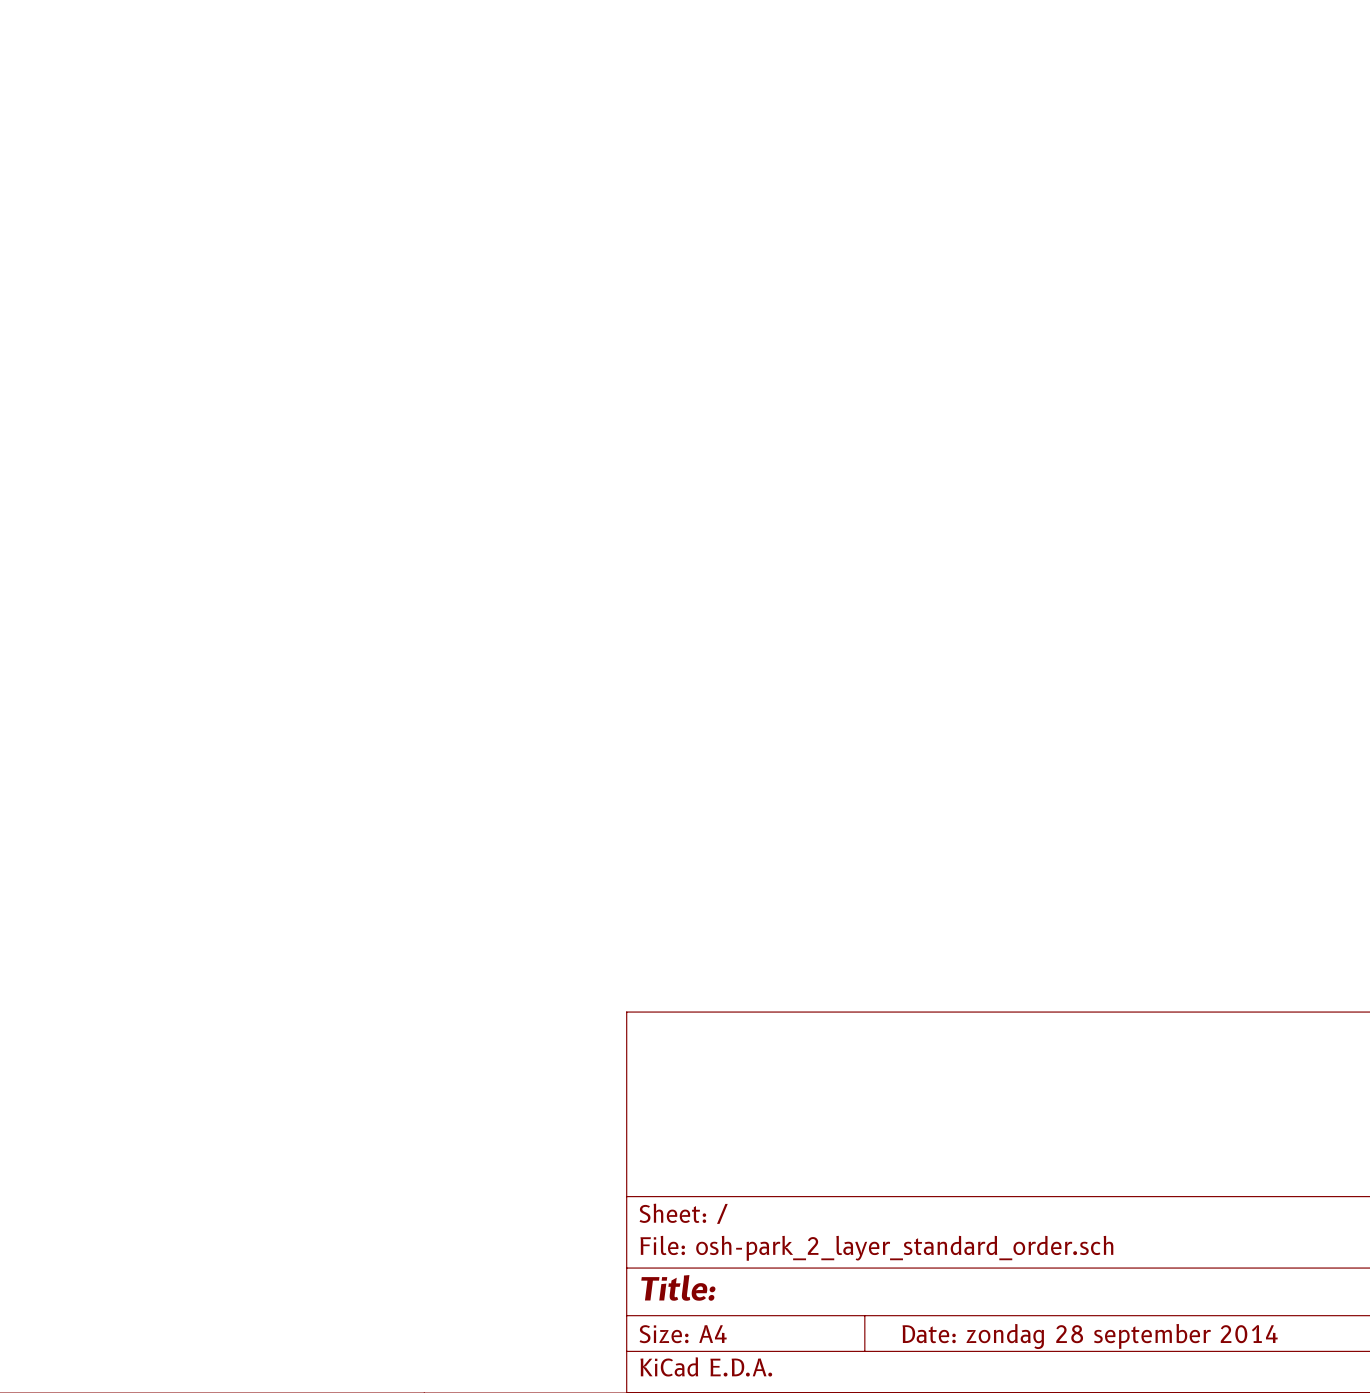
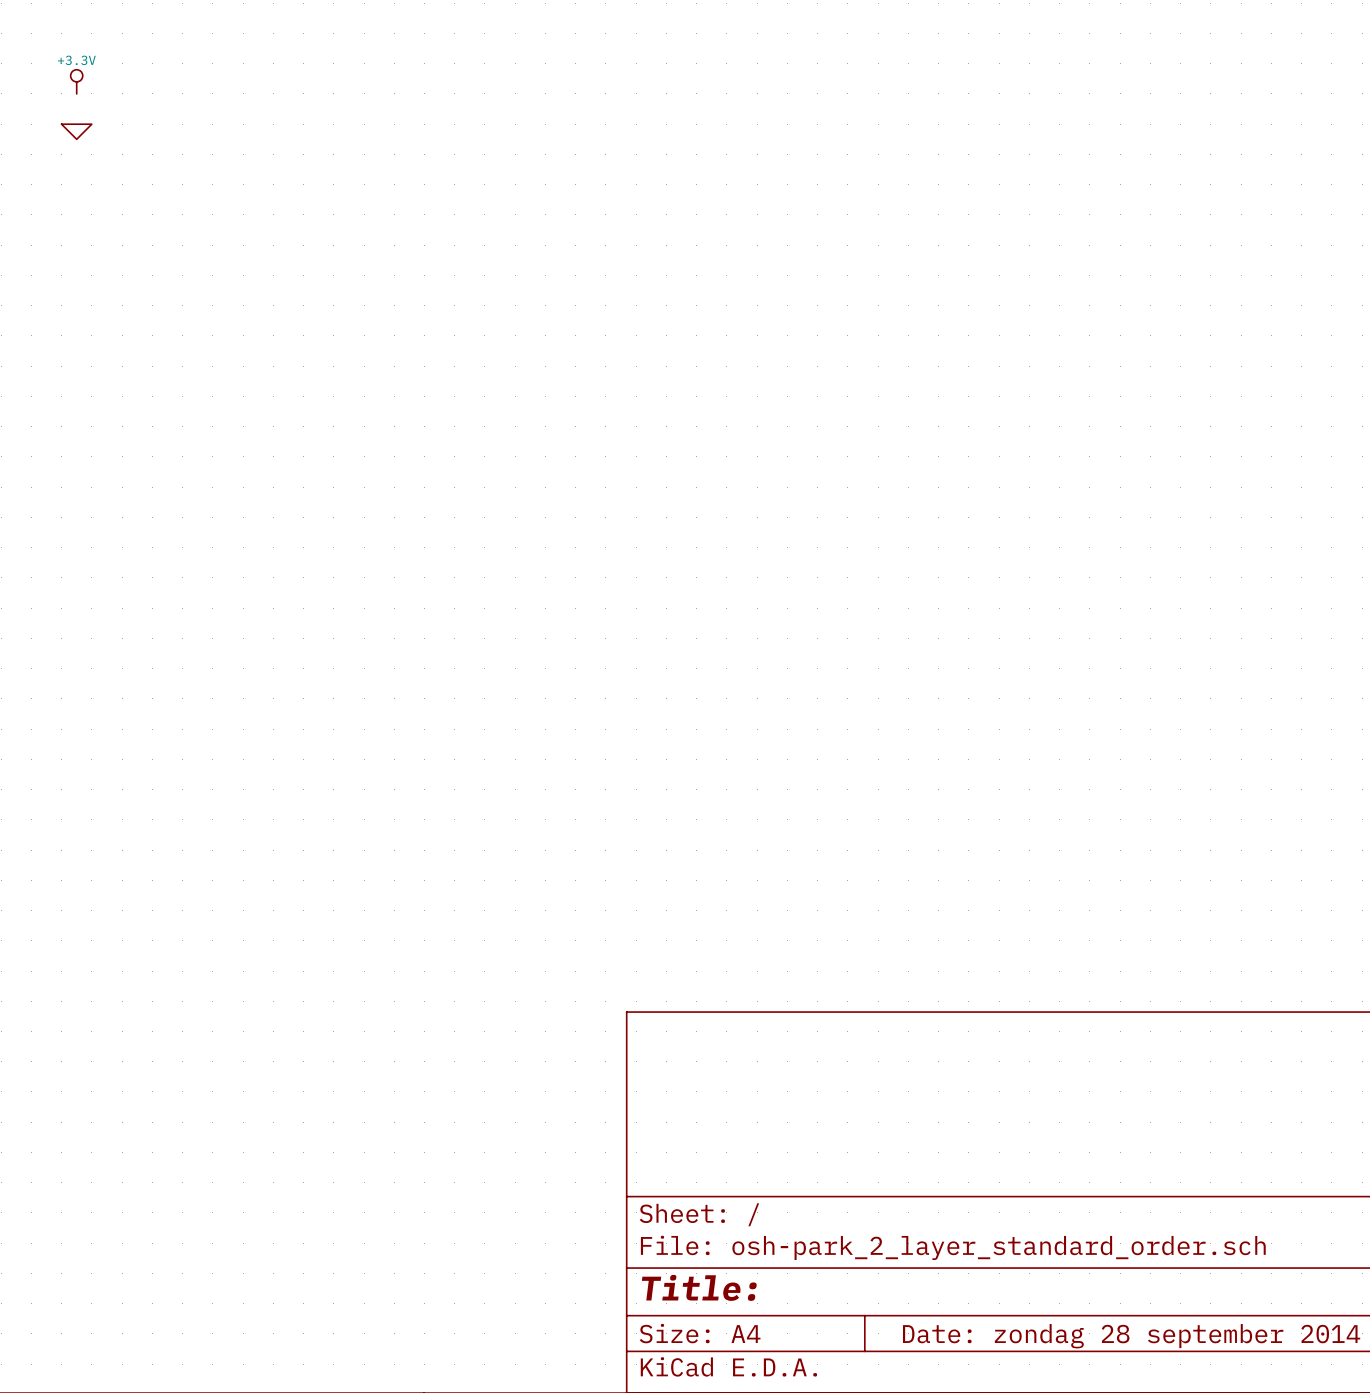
power symbol: none -> +3.3V (76, 81)
power symbol: none -> (76, 131)

